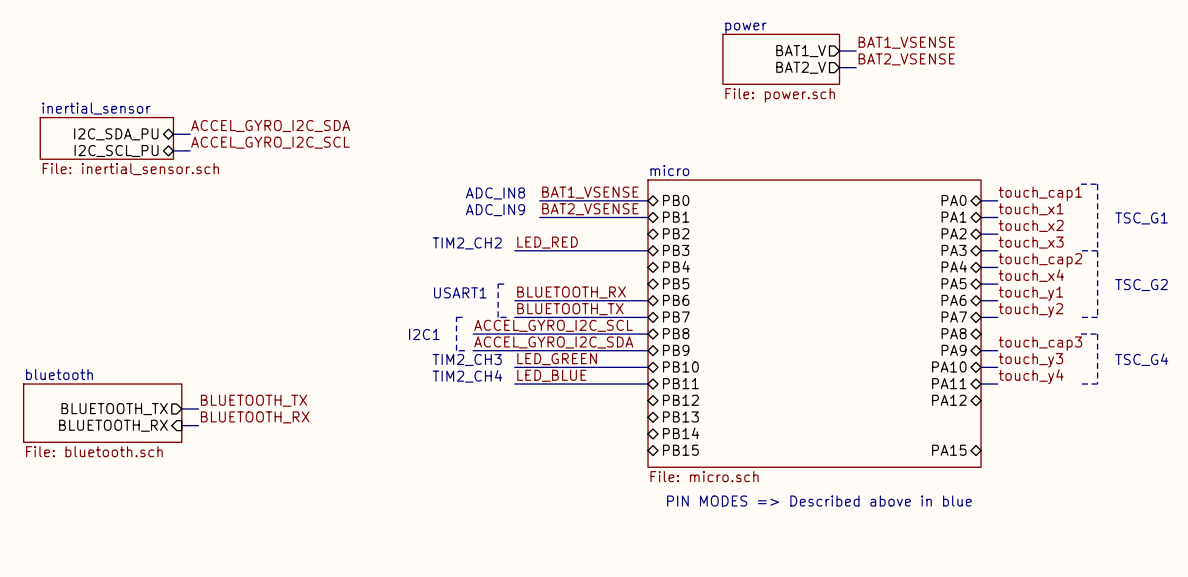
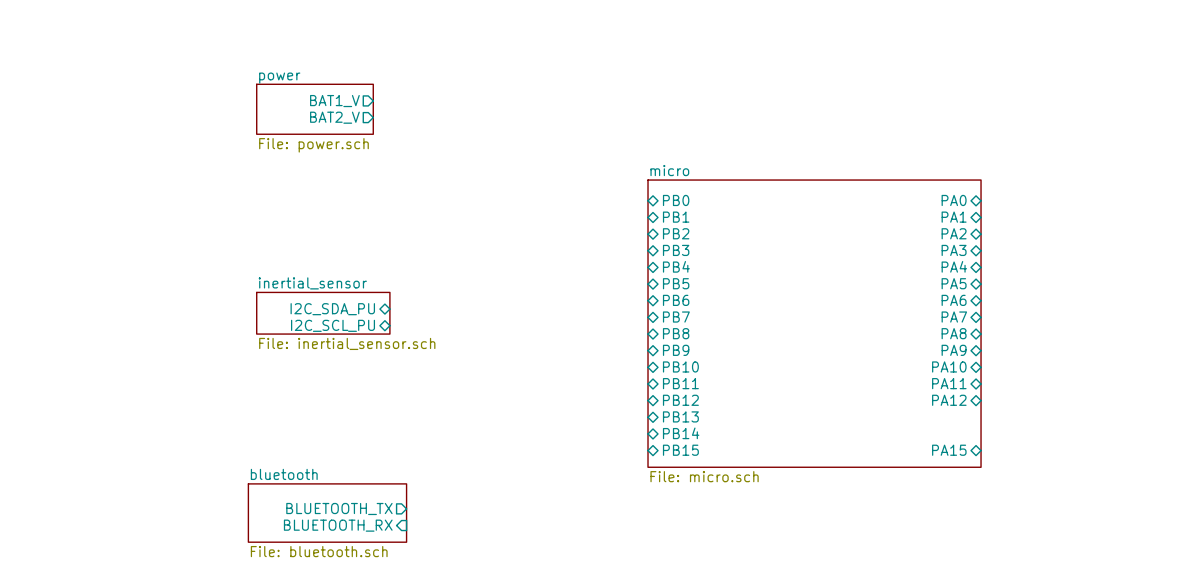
label: BAT1_VSENSE (906, 42) -> none
wire: (839, 50) (856, 50) -> none
sheet pin: BAT1_V (801, 51) -> none
sheet power: File: power.sch (781, 59) -> none
label: BAT2_VSENSE (906, 59) -> none
sheet pin: BAT2_V (801, 67) -> none
wire: (839, 67) (856, 67) -> none
sheet pin: none -> BAT1_V (334, 101)
sheet power: none -> File: power.sch (314, 109)
sheet pin: none -> BAT2_V (334, 117)
label: ACCEL_GYRO_I2C_SDA (270, 126) -> none
sheet pin: I2C_SDA_PU (116, 134) -> none
wire: (173, 134) (190, 134) -> none
sheet inertial_sensor: File: inertial_sensor.sch (106, 138) -> none
label: ACCEL_GYRO_I2C_SCL (270, 142) -> none
sheet pin: I2C_SCL_PU (116, 150) -> none
wire: (173, 150) (190, 150) -> none
line: (1080, 184) (1097, 184) (1097, 317) (1080, 317) -> none
label: BAT1_VSENSE (590, 192) -> none
text: ADC_IN8 (495, 193) -> none
label: touch_cap1 (1040, 193) -> none
wire: (539, 200) (648, 200) -> none
wire: (981, 200) (997, 200) -> none
label: BAT2_VSENSE (590, 209) -> none
label: touch_x1 (1031, 209) -> none
text: ADC_IN9 (495, 210) -> none
wire: (539, 217) (648, 217) -> none
wire: (981, 217) (997, 217) -> none
text: TSC_G1 (1141, 218) -> none
label: touch_x2 (1031, 225) -> none
wire: (981, 234) (997, 234) -> none
label: LED_RED (547, 242) -> none
label: touch_x3 (1031, 242) -> none
text: TIM2_CH2 (467, 243) -> none
wire: (514, 250) (648, 250) -> none
wire: (981, 250) (997, 250) -> none
line: (1080, 250) (1097, 250) -> none
label: touch_cap2 (1040, 260) -> none
wire: (981, 267) (997, 267) -> none
label: touch_x4 (1031, 275) -> none
line: (506, 284) (498, 284) (498, 317) (506, 317) -> none
wire: (981, 284) (997, 284) -> none
text: TSC_G2 (1141, 285) -> none
text: USART1 (460, 292) -> none
label: BLUETOOTH_RX (571, 292) -> none
label: touch_y1 (1030, 293) -> none
wire: (514, 300) (648, 300) -> none
wire: (981, 300) (997, 300) -> none
sheet pin: none -> I2C_SDA_PU (332, 309)
label: BLUETOOTH_TX (570, 309) -> none
label: touch_y2 (1030, 310) -> none
sheet inertial_sensor: none -> File: inertial_sensor.sch (323, 313)
line: (464, 317) (456, 317) (456, 350) (464, 350) -> none
wire: (514, 317) (648, 317) -> none
wire: (981, 317) (997, 317) -> none
sheet pin: none -> I2C_SCL_PU (333, 325)
label: ACCEL_GYRO_I2C_SCL (553, 325) -> none
text: I2C1 (424, 334) -> none
wire: (473, 334) (648, 334) -> none
line: (1080, 334) (1097, 334) (1097, 384) (1080, 384) -> none
label: ACCEL_GYRO_I2C_SDA (553, 342) -> none
label: touch_cap3 (1040, 343) -> none
wire: (473, 350) (648, 350) -> none
wire: (981, 350) (997, 350) -> none
text: TIM2_CH3 (467, 359) -> none
label: LED_GREEN (557, 359) -> none
text: TSC_G4 (1141, 359) -> none
label: touch_y3 (1030, 360) -> none
wire: (514, 367) (648, 367) -> none
wire: (981, 367) (997, 367) -> none
label: LED_BLUE (551, 375) -> none
text: TIM2_CH4 (467, 376) -> none
label: touch_y4 (1031, 376) -> none
wire: (514, 384) (648, 384) -> none
wire: (981, 384) (997, 384) -> none
label: BLUETOOTH_TX (254, 400) -> none
wire: (181, 408) (198, 408) -> none
sheet pin: BLUETOOTH_TX (114, 409) -> none
sheet bluetooth: File: bluetooth.sch (102, 413) -> none
label: BLUETOOTH_RX (255, 417) -> none
sheet pin: BLUETOOTH_RX (113, 425) -> none
wire: (181, 425) (198, 425) -> none
text: PIN MODES => Described above in blue (819, 501) -> none
sheet pin: none -> BLUETOOTH_TX (339, 508)
sheet bluetooth: none -> File: bluetooth.sch (327, 513)
sheet pin: none -> BLUETOOTH_RX (338, 525)

